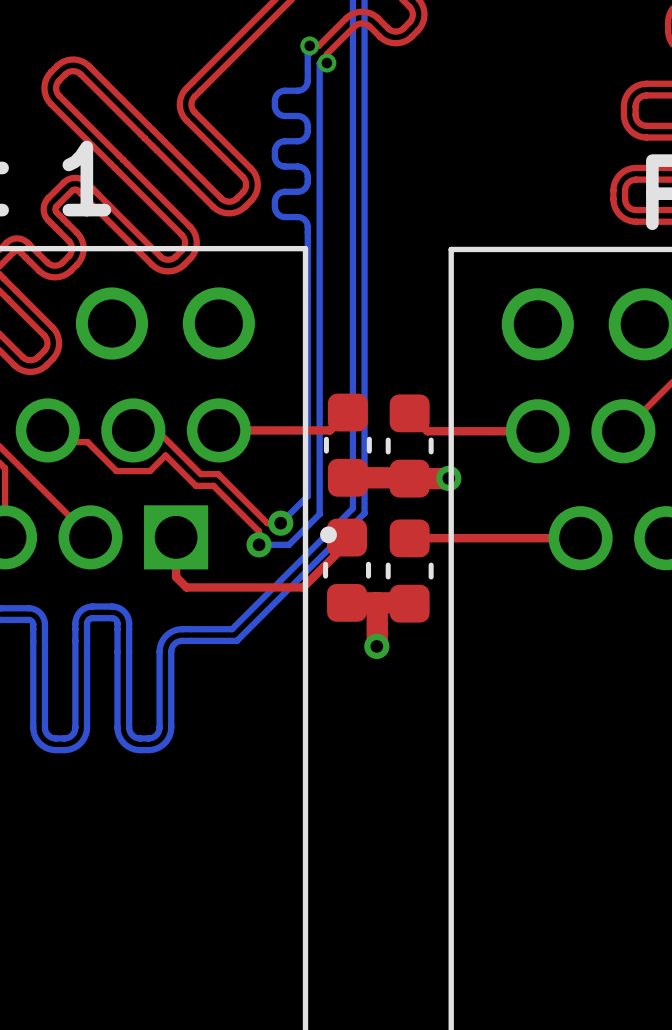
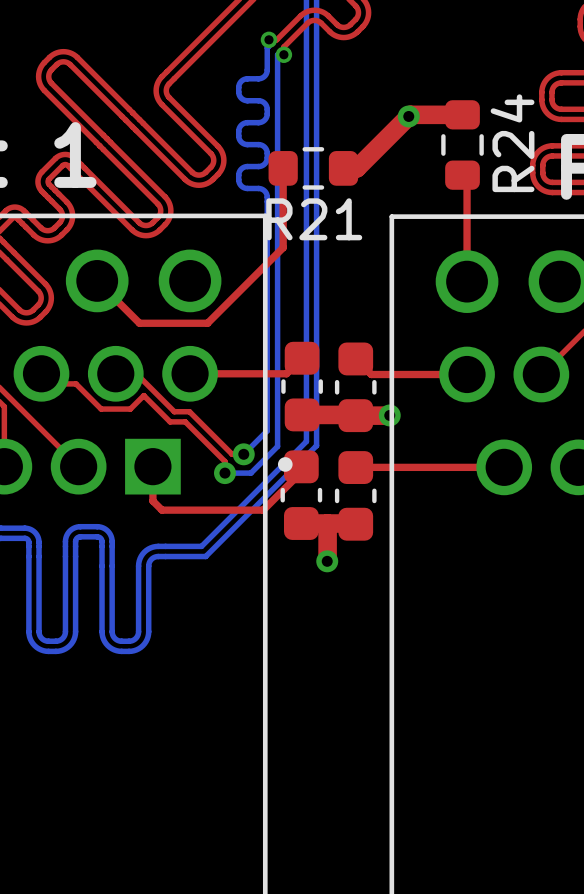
top track: none -> (462, 114) (410, 114) (356, 168) (343, 168)
via: none -> (408, 116)
R24: none -> (462, 144)
top track: none -> (283, 168) (283, 247) (207, 323) (139, 323) (97, 280)
R21: none -> (313, 168)
top track: none -> (462, 175) (467, 179) (467, 281)

